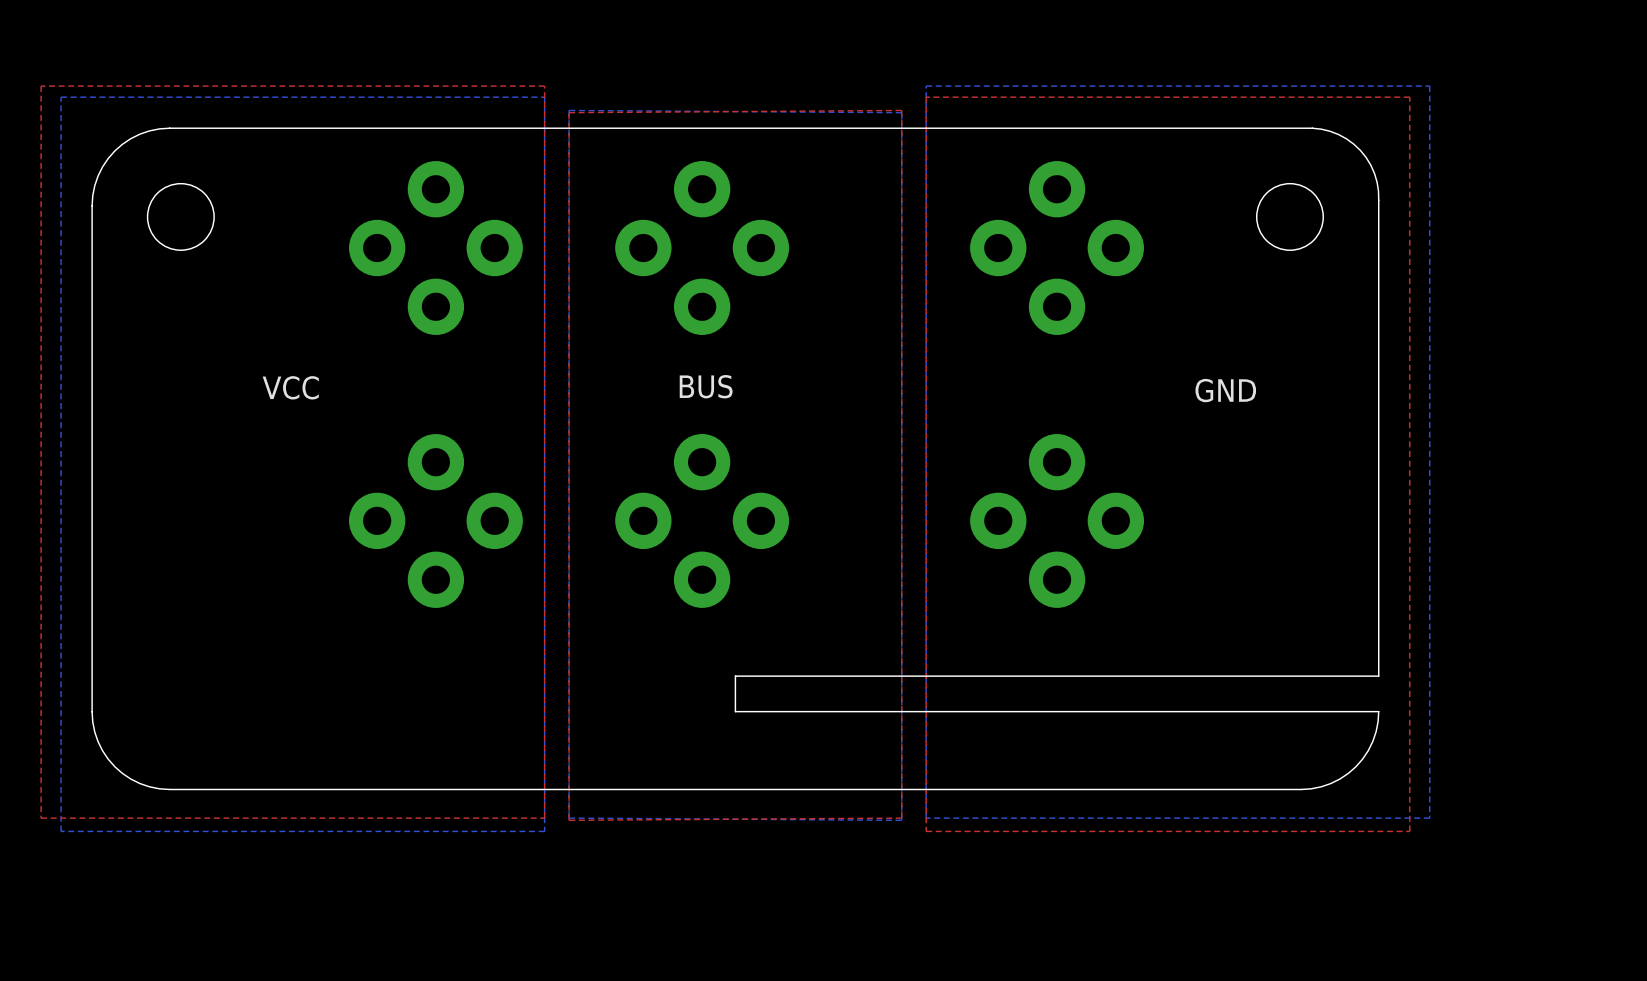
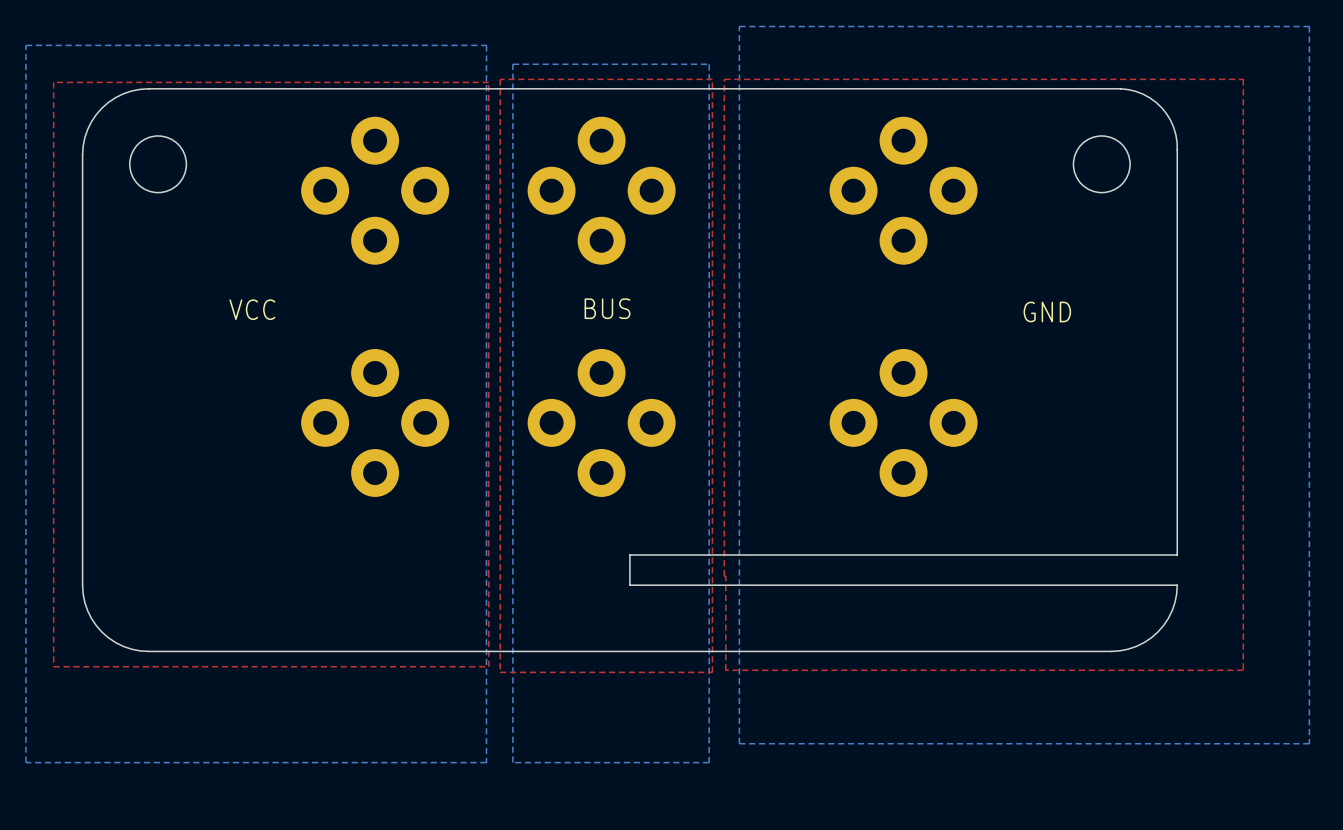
top zone outline: (41, 86) (41, 818) (544, 818) (544, 86) (41, 86) -> (488, 576) (488, 82) (53, 82) (53, 666) (488, 666) (488, 576)
bottom zone outline: (926, 86) (926, 818) (1429, 818) (1429, 86) (926, 86) -> (739, 26) (739, 743) (1309, 743) (1309, 26) (739, 26)
bottom zone outline: (61, 97) (544, 97) (544, 831) (61, 831) (61, 97) -> (25, 45) (25, 762) (486, 762) (486, 45) (25, 45)
top zone outline: (926, 97) (1409, 97) (1409, 831) (926, 831) (926, 97) -> (724, 79) (725, 670) (1243, 670) (1243, 79) (724, 79)
bottom zone outline: (569, 110) (569, 818) (901, 820) (901, 112) (569, 110) -> (512, 64) (512, 762) (709, 762) (709, 64) (512, 64)
top zone outline: (901, 110) (901, 818) (569, 820) (569, 112) (901, 110) -> (500, 79) (500, 672) (712, 672) (712, 79) (500, 79)

